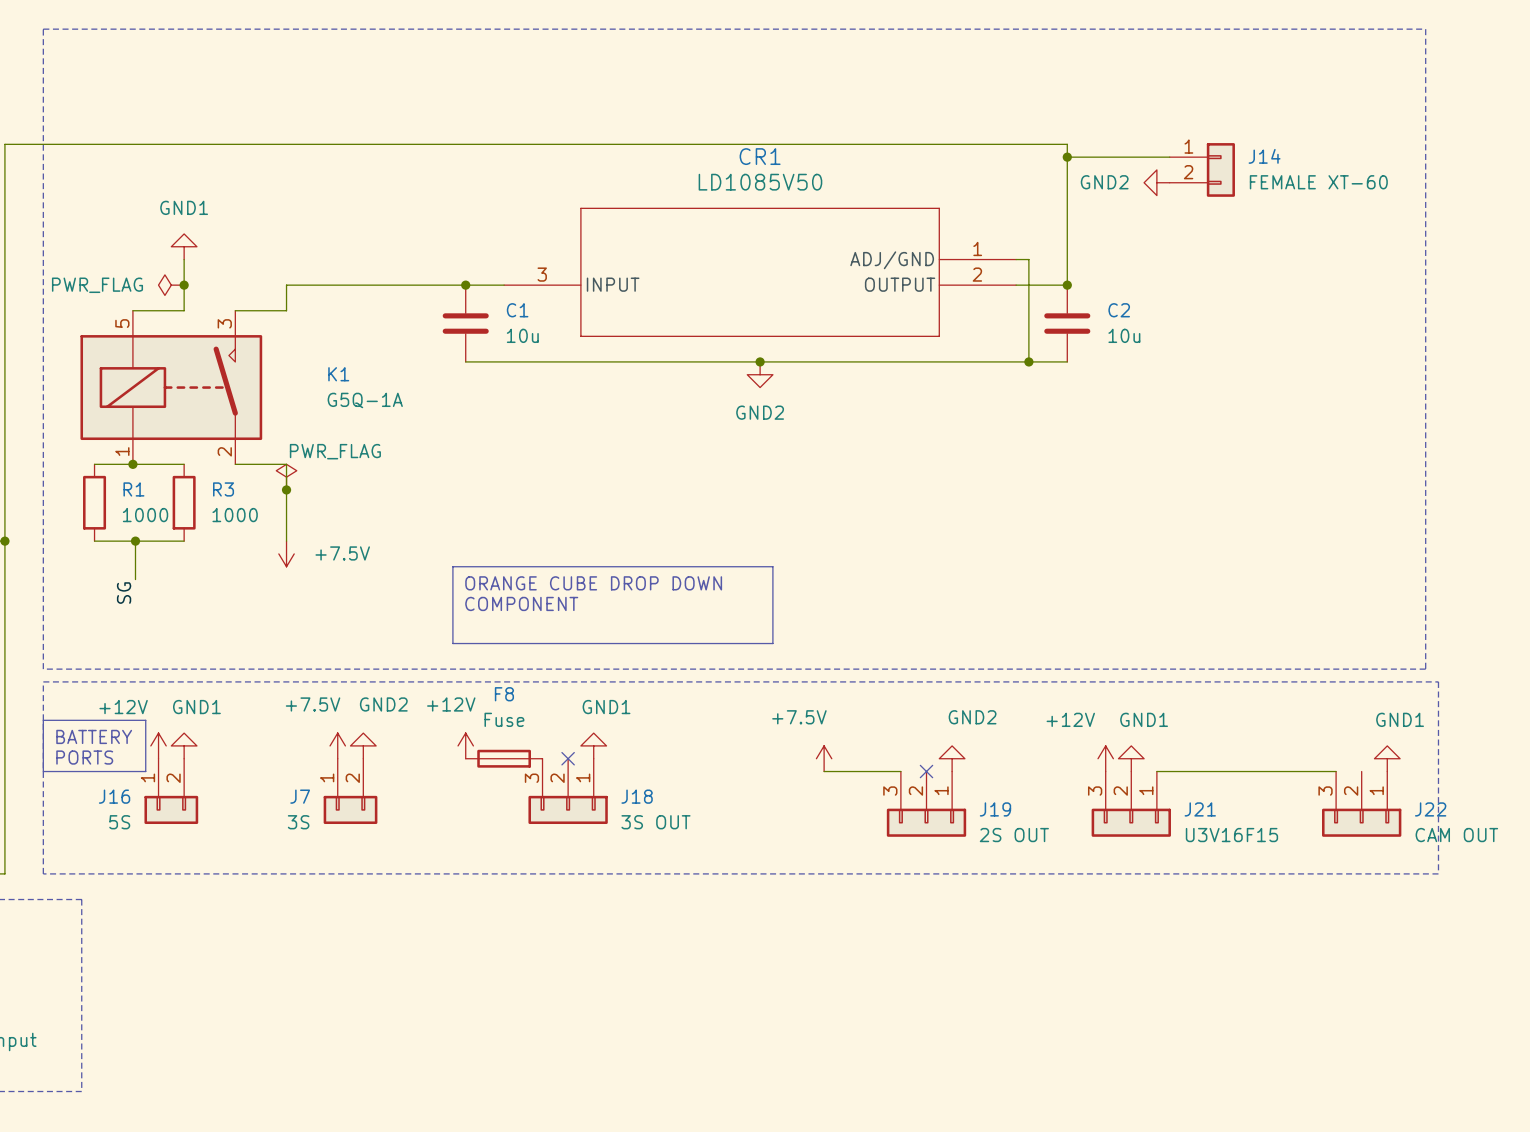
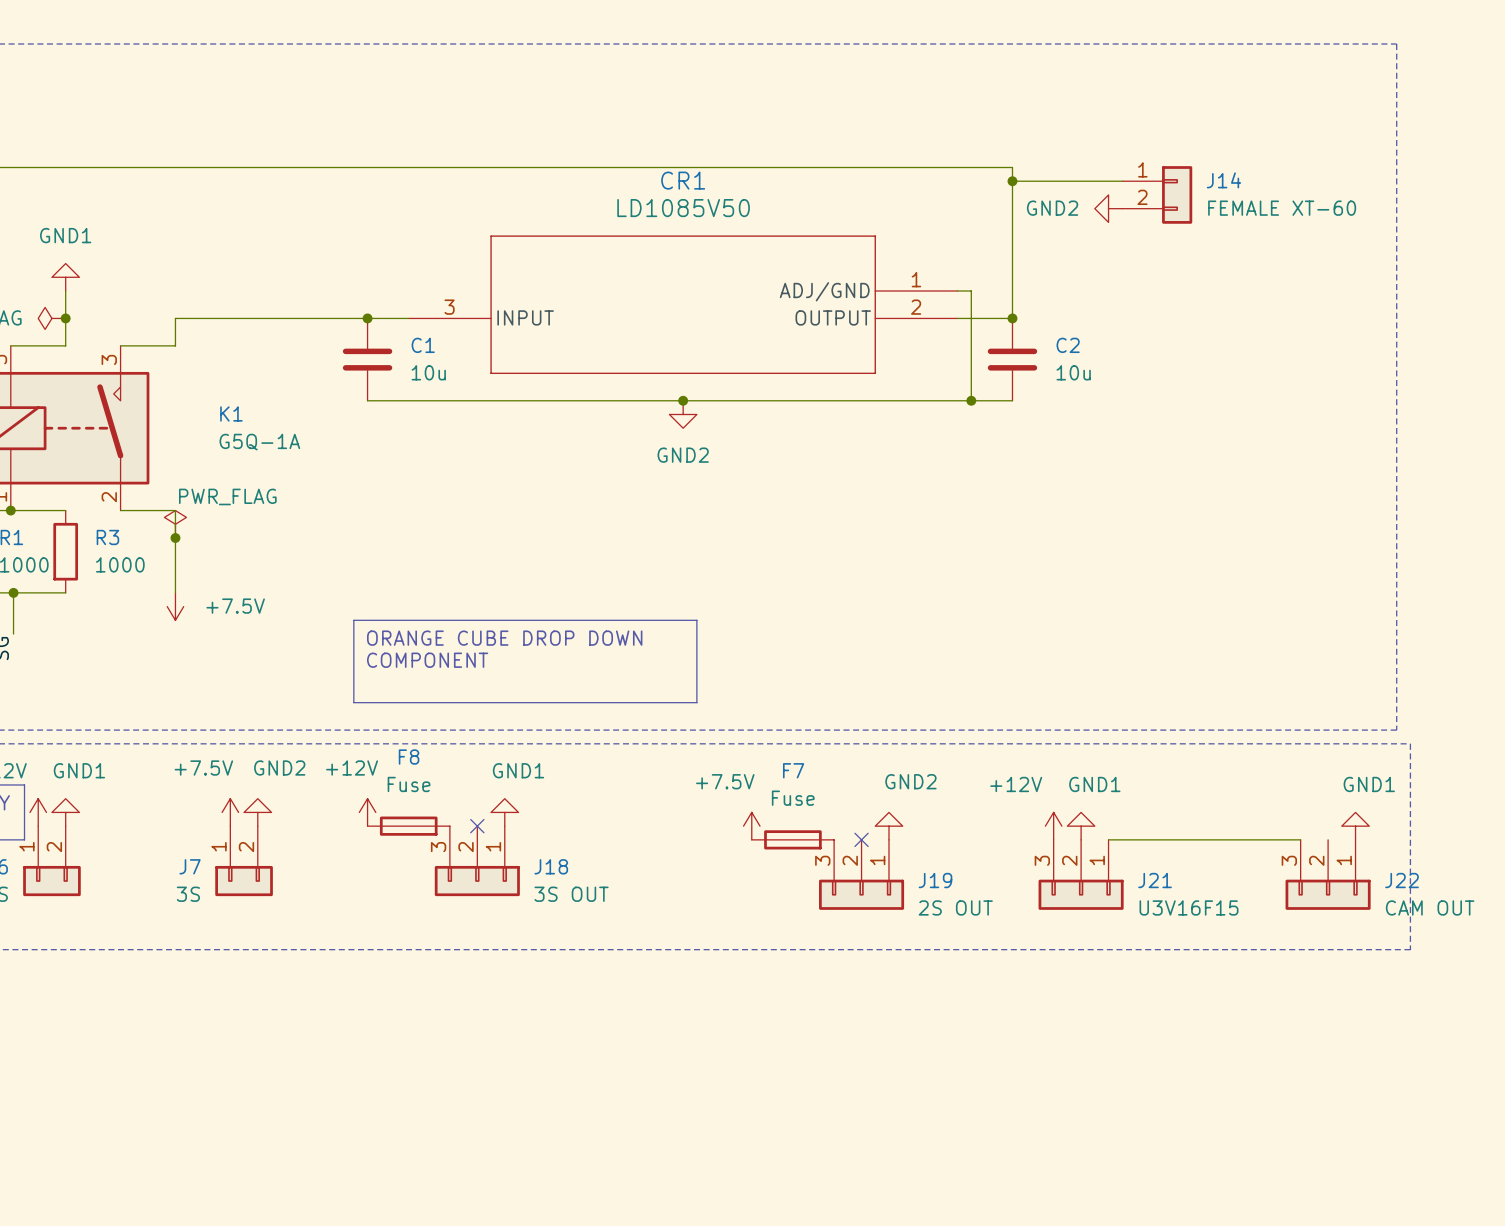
F7: none -> Fuse (792, 839)

